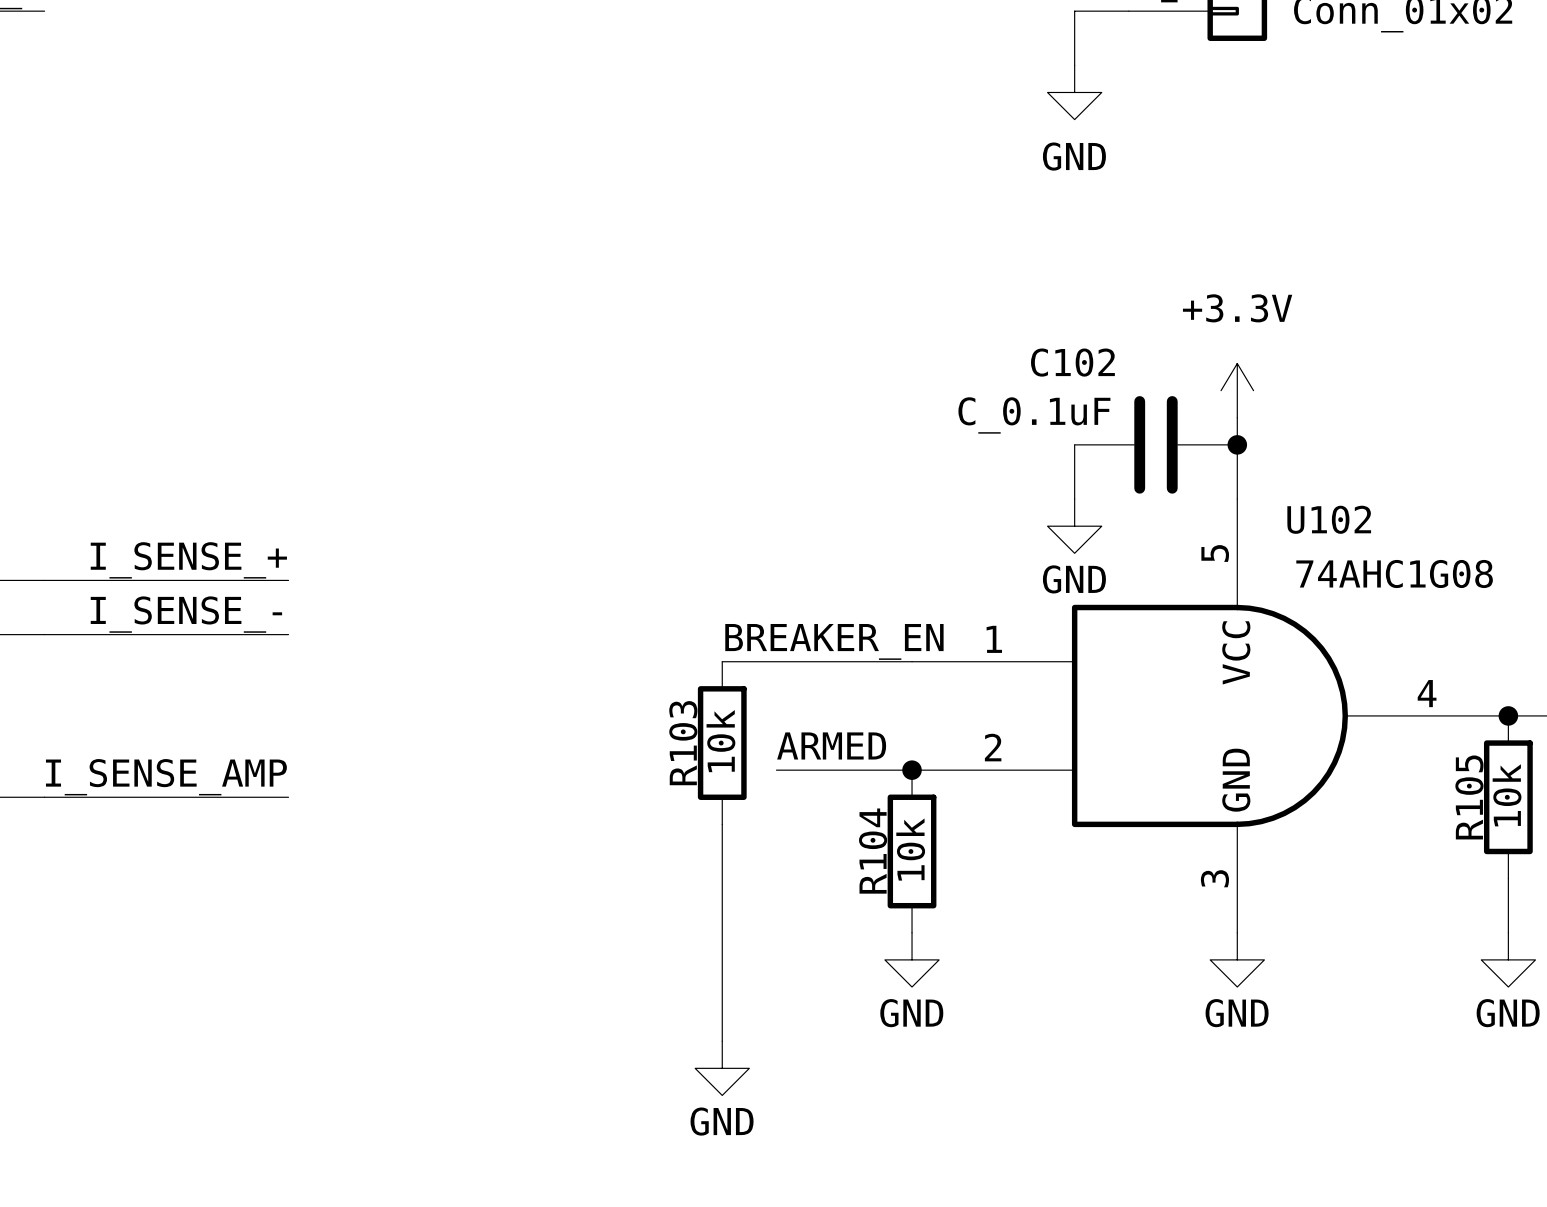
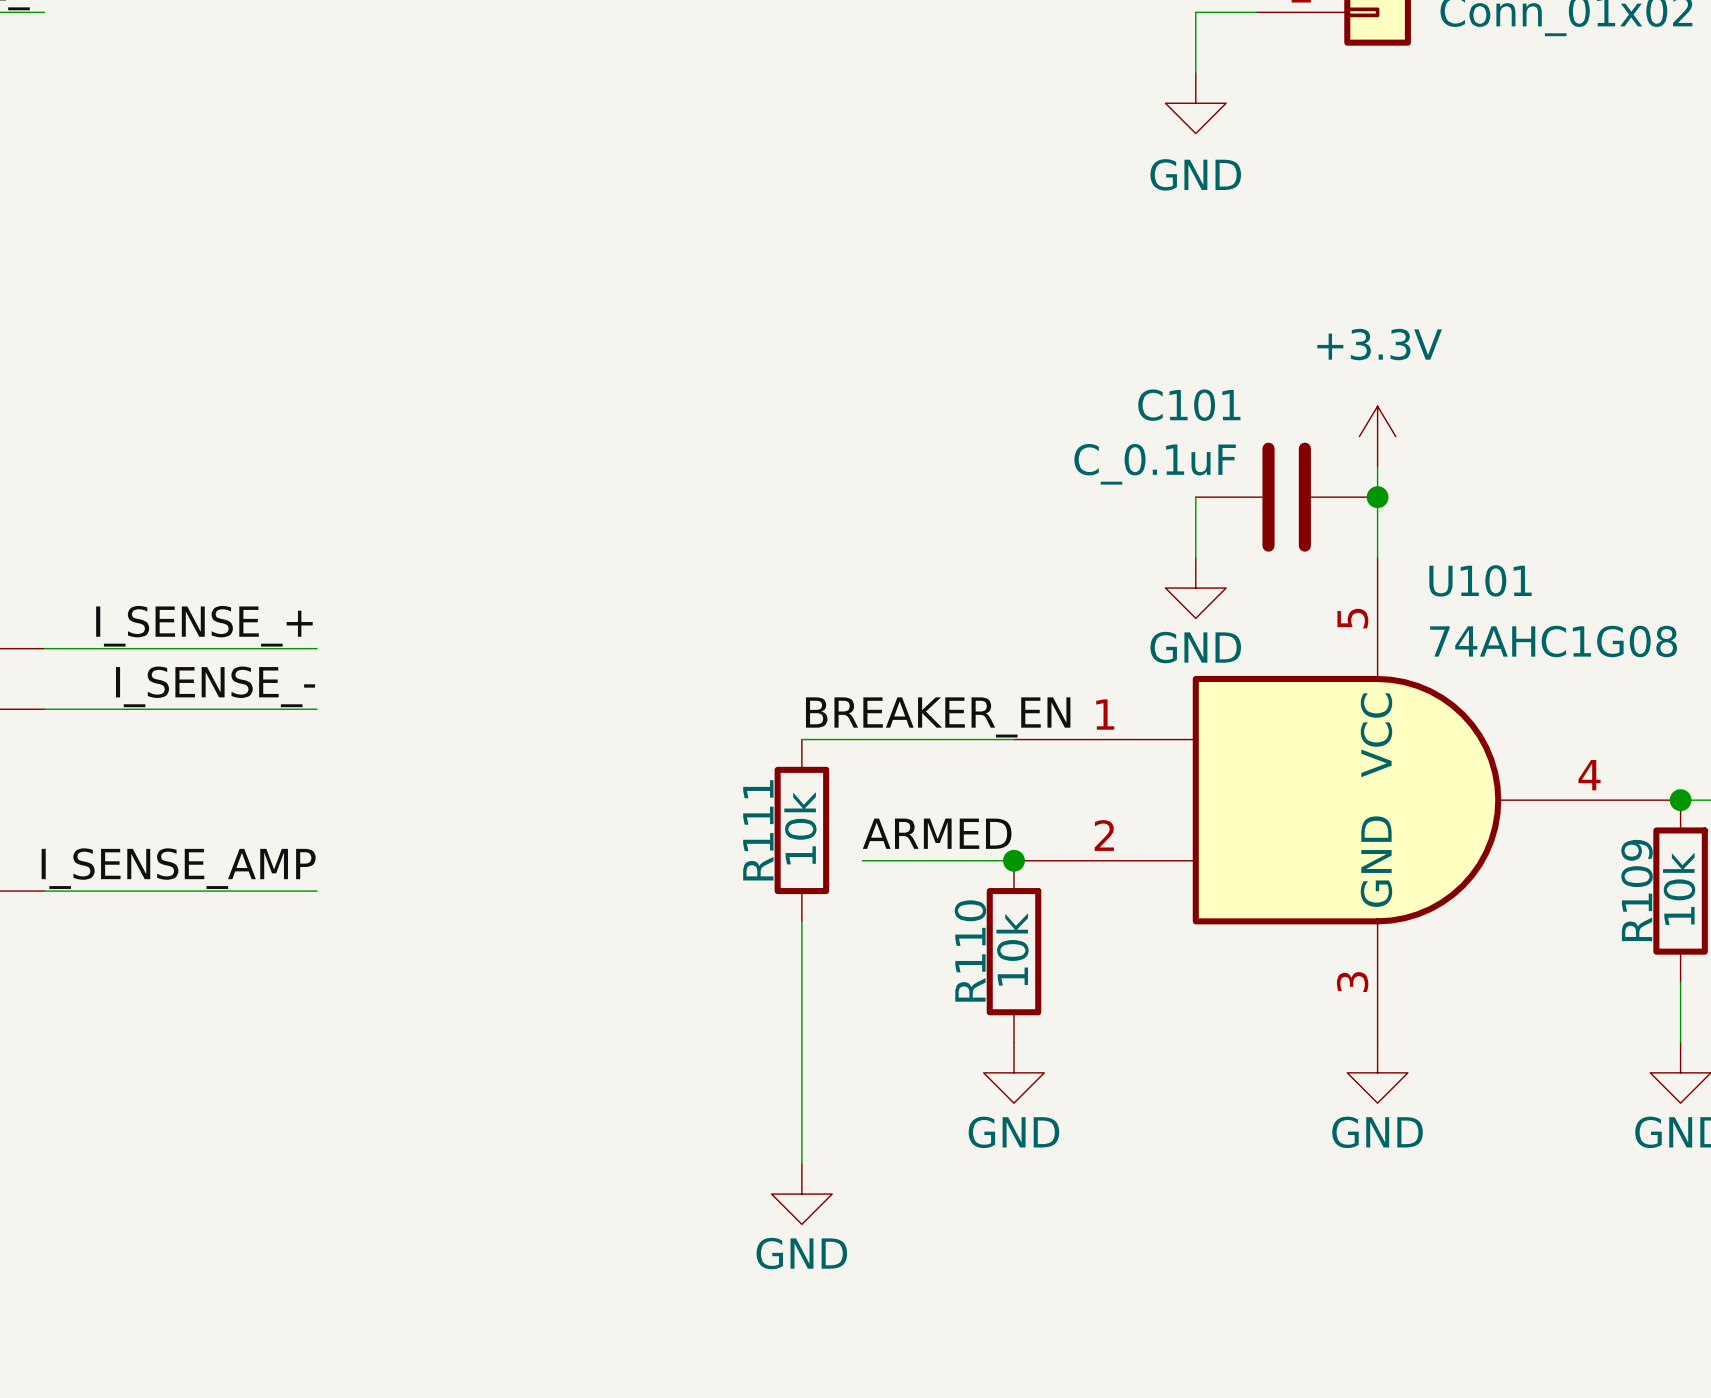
C102 name: C102 (1072, 362) -> C101 (1189, 405)
U102 name: U102 (1329, 519) -> U101 (1480, 580)
R103 name: R103 (683, 743) -> R111 (758, 830)
R105 name: R105 (1469, 797) -> R109 (1637, 890)
R104 name: R104 (873, 851) -> R110 (970, 951)

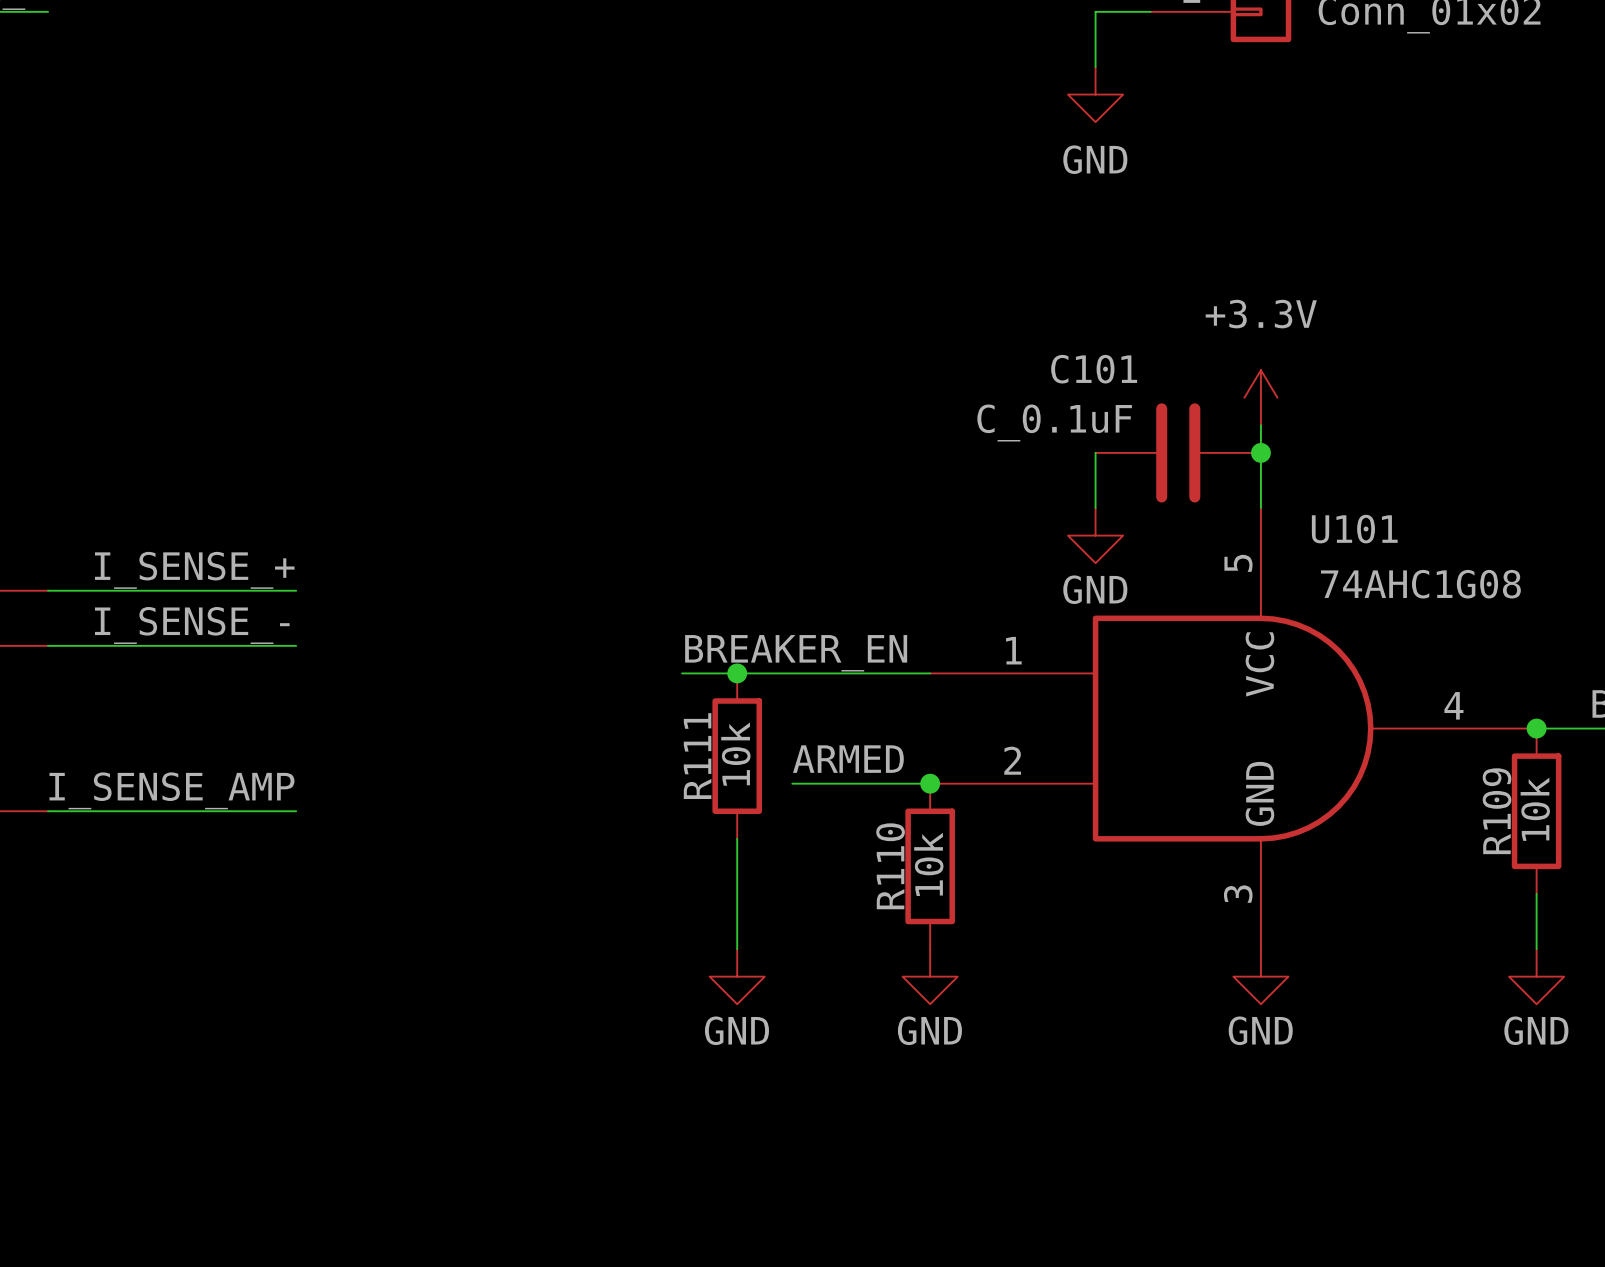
label position: BREAKER_EN (938, 717) -> BREAKER_EN (796, 653)
wire: none -> (682, 673) (737, 673)
junction: none -> (737, 673)
wire: (801, 1042) (801, 1163) -> none
power symbol position: GND (801, 1194) -> GND (737, 976)

